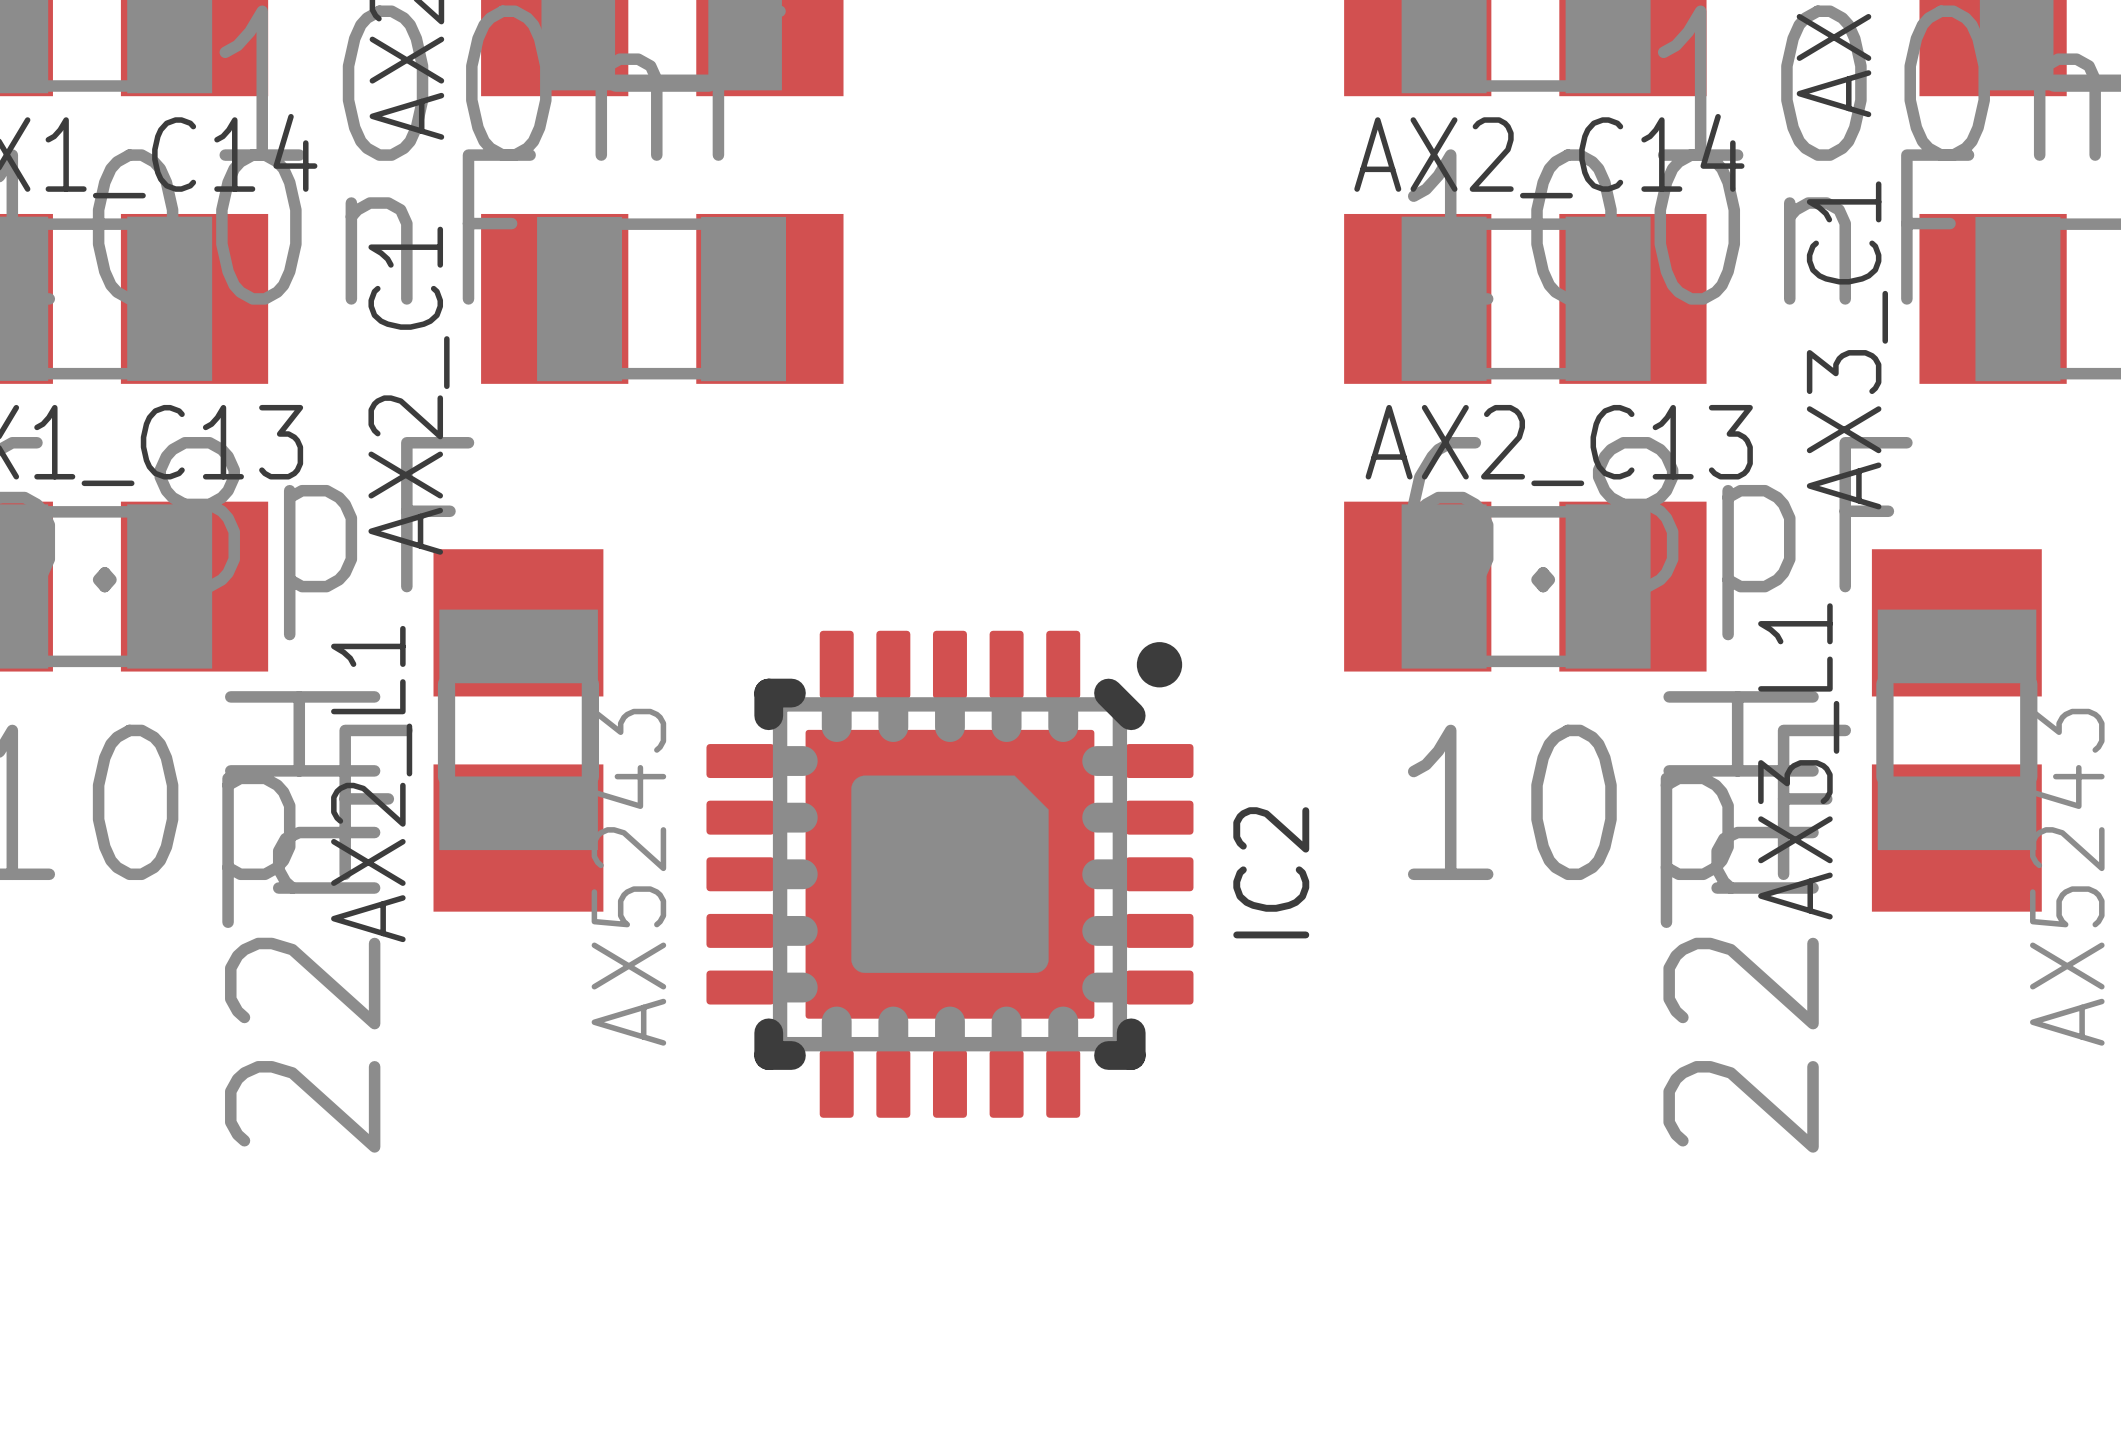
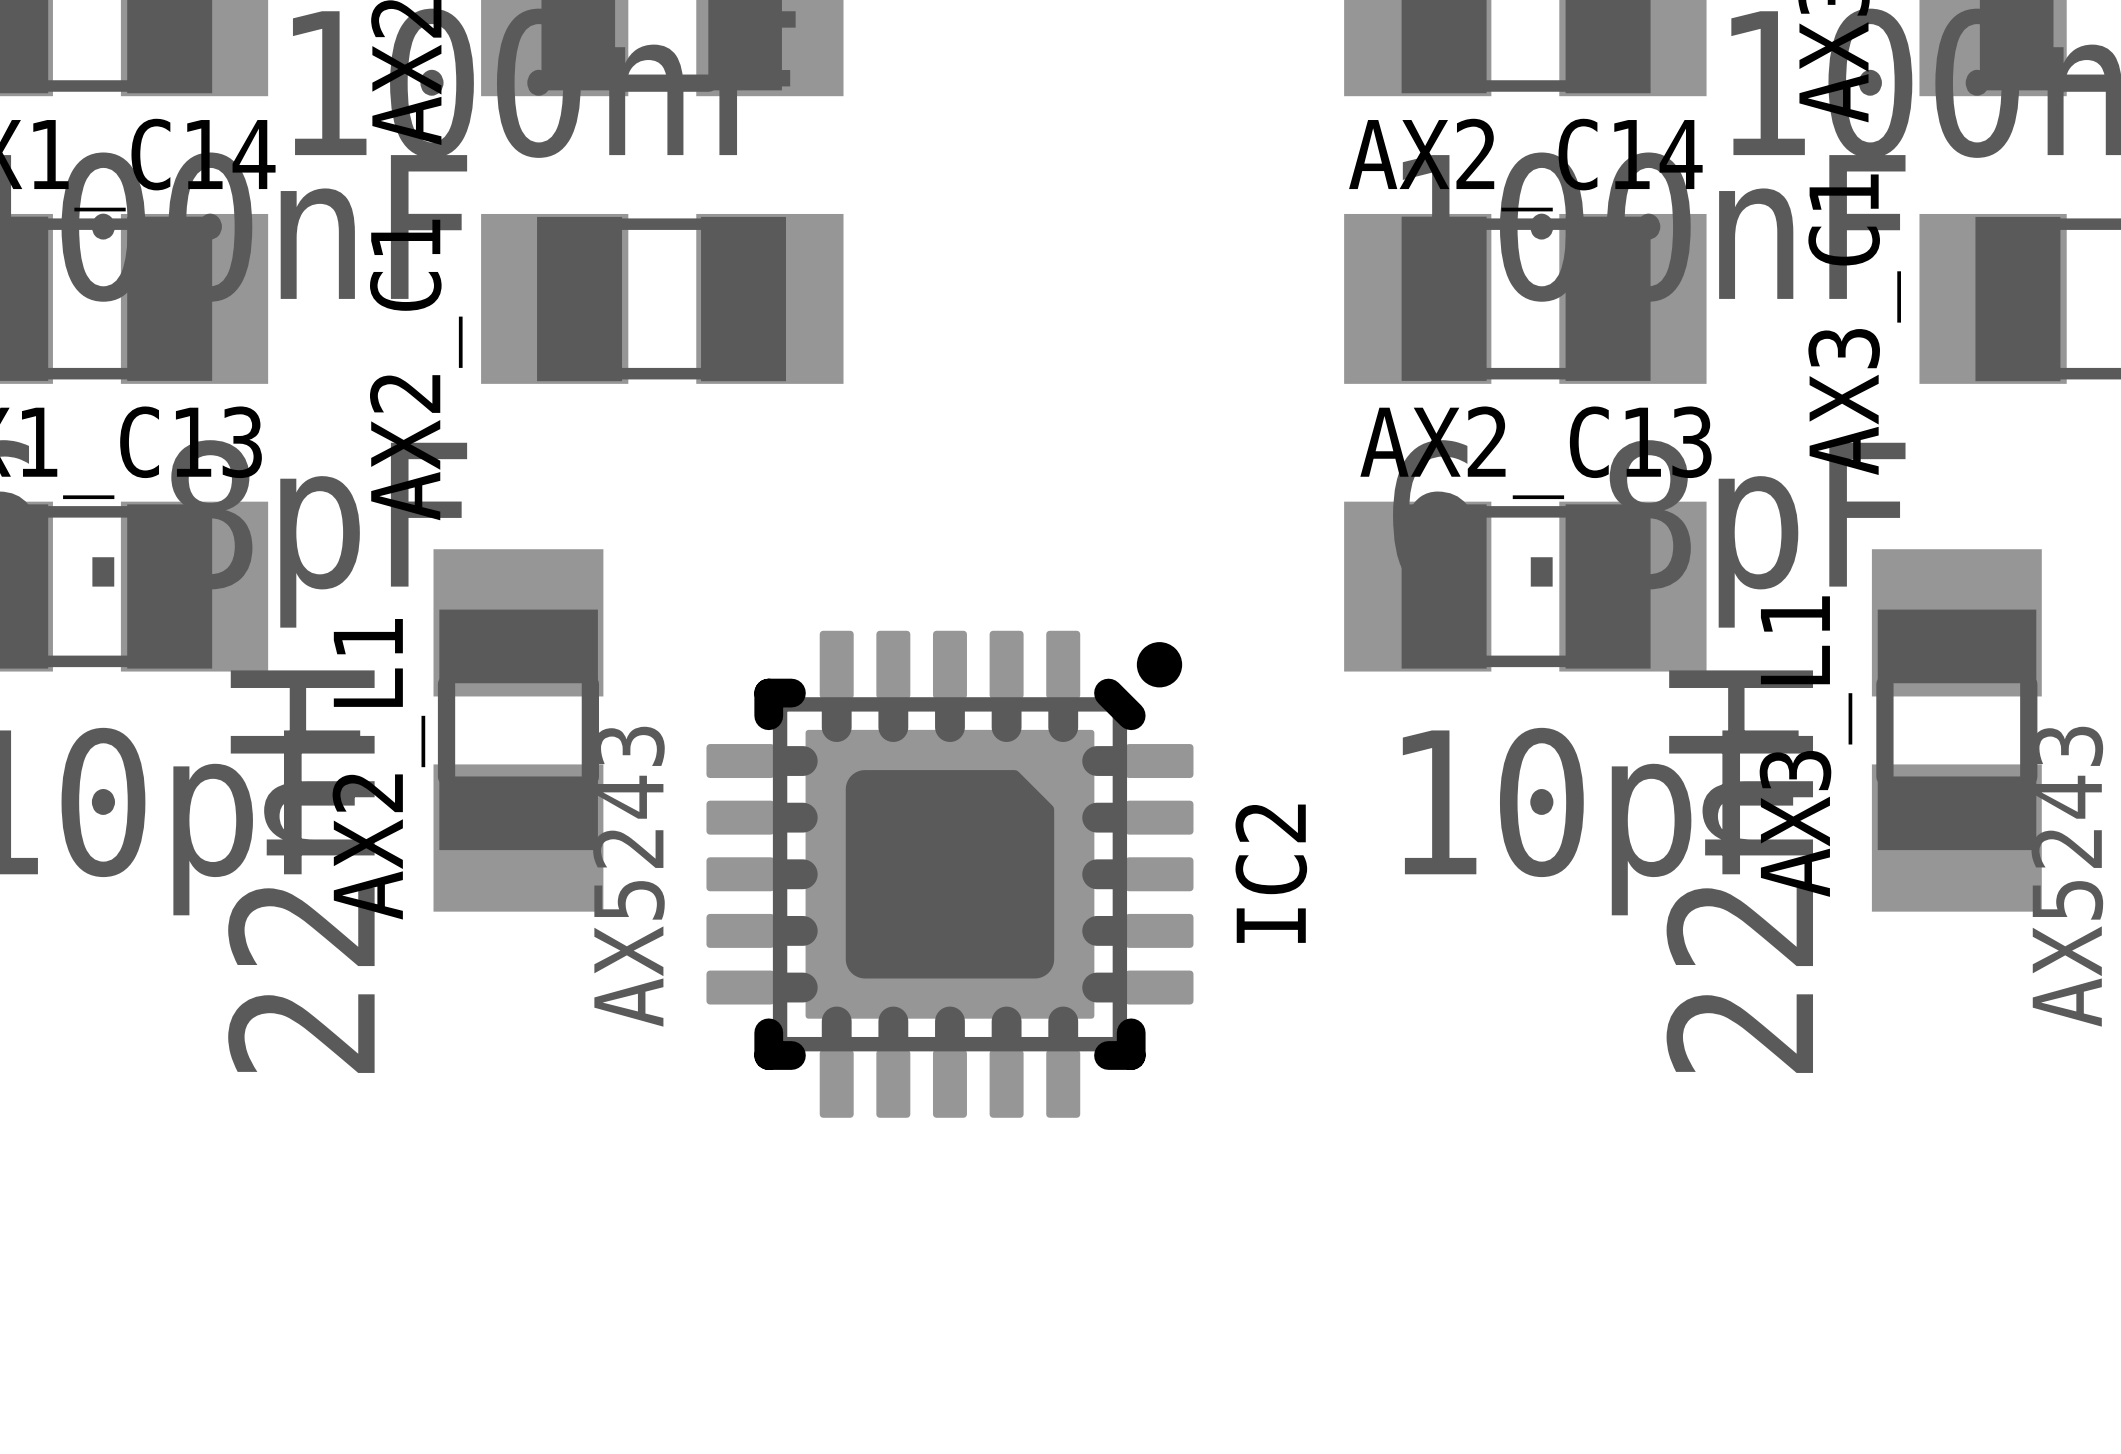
IC2 footprint: [706, 630, 1194, 1118] -> [706, 630, 1194, 1118]

